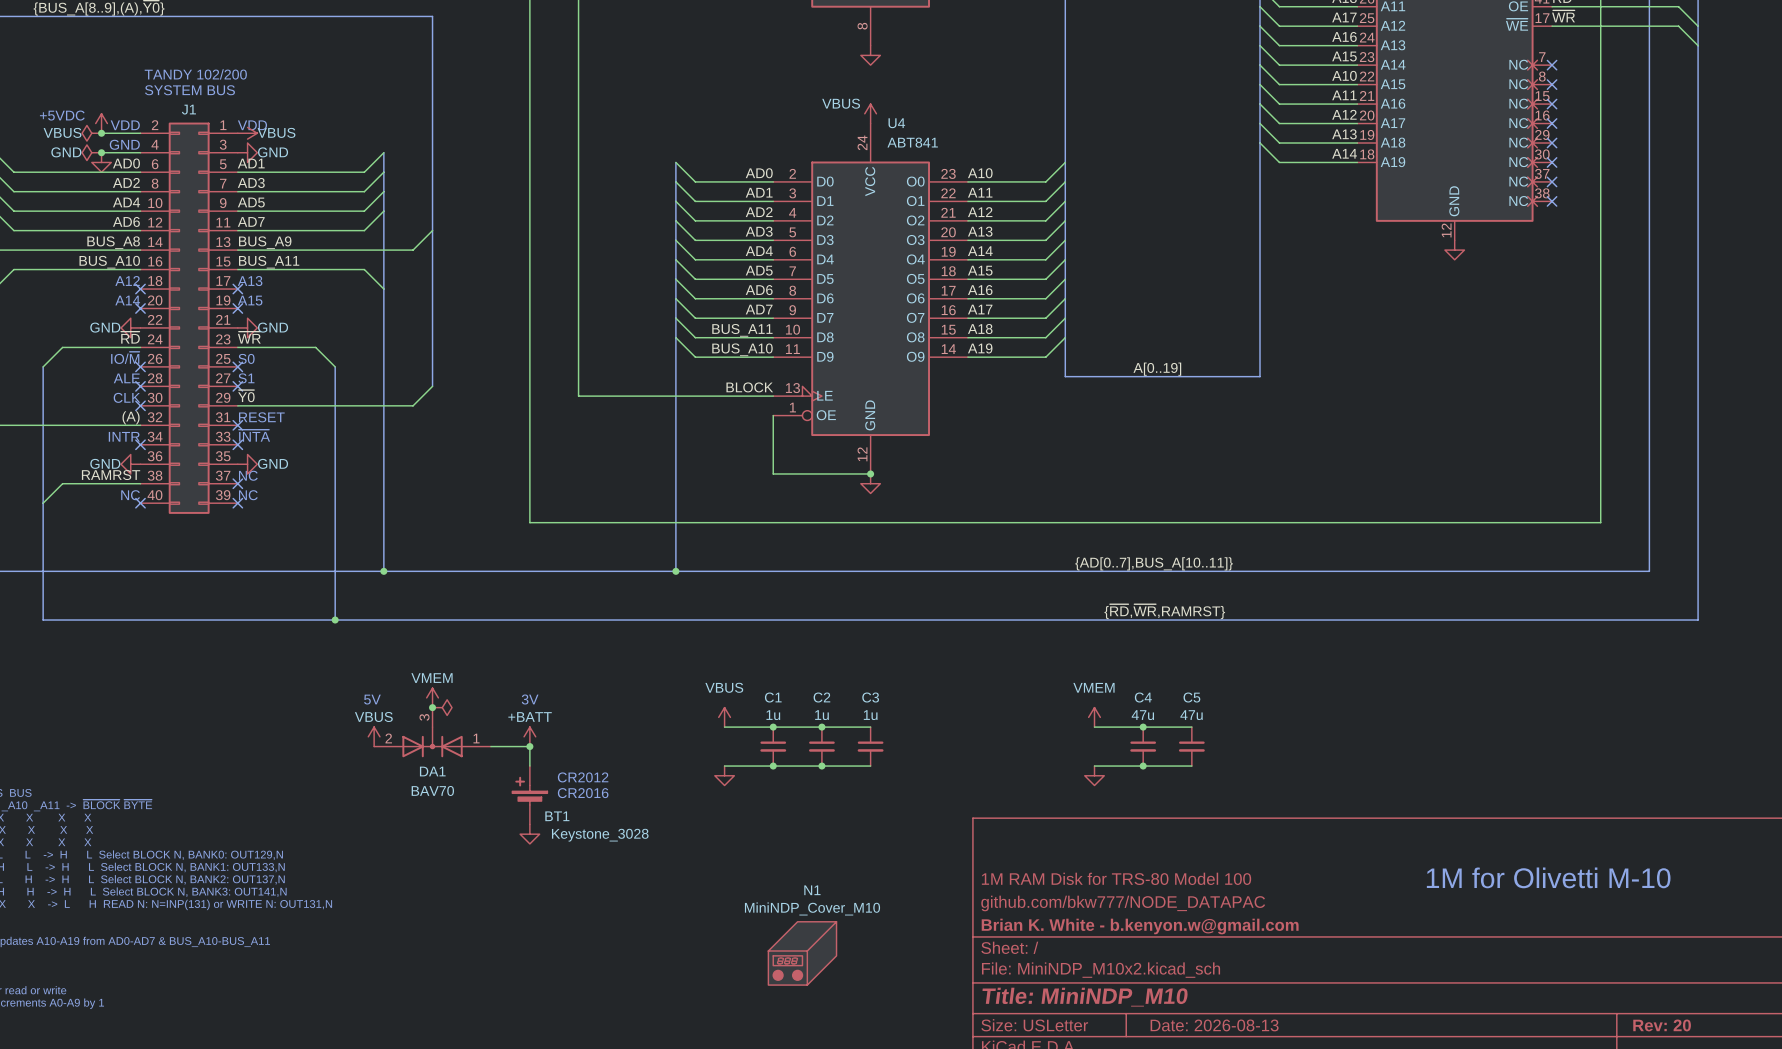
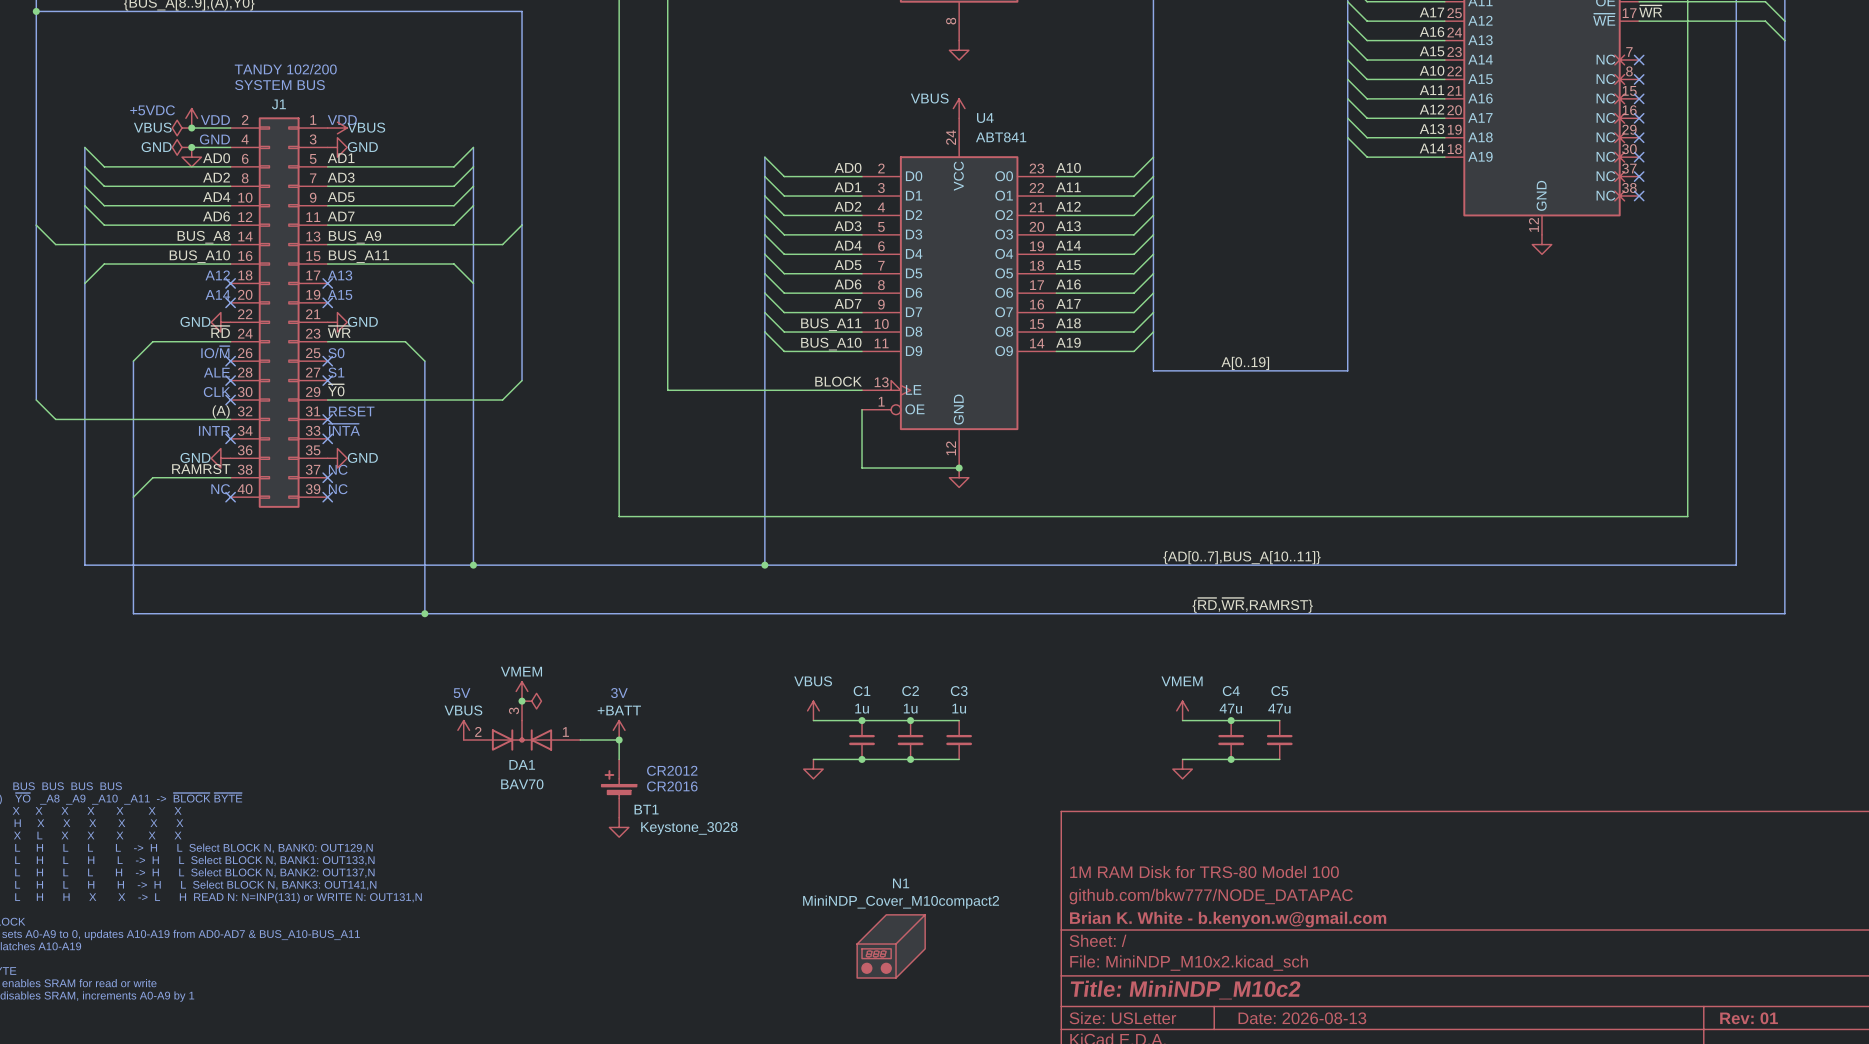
text: 1M for Olivetti M-10 (1548, 877) -> none
N1 value: MiniNDP_Cover_M10 (812, 908) -> MiniNDP_Cover_M10compact2 (901, 902)
title block: Title: MiniNDP_M10 (1085, 997) -> Title: MiniNDP_M10c2 (1185, 990)
title block: Rev: 20 (1662, 1025) -> Rev: 01 (1749, 1018)

